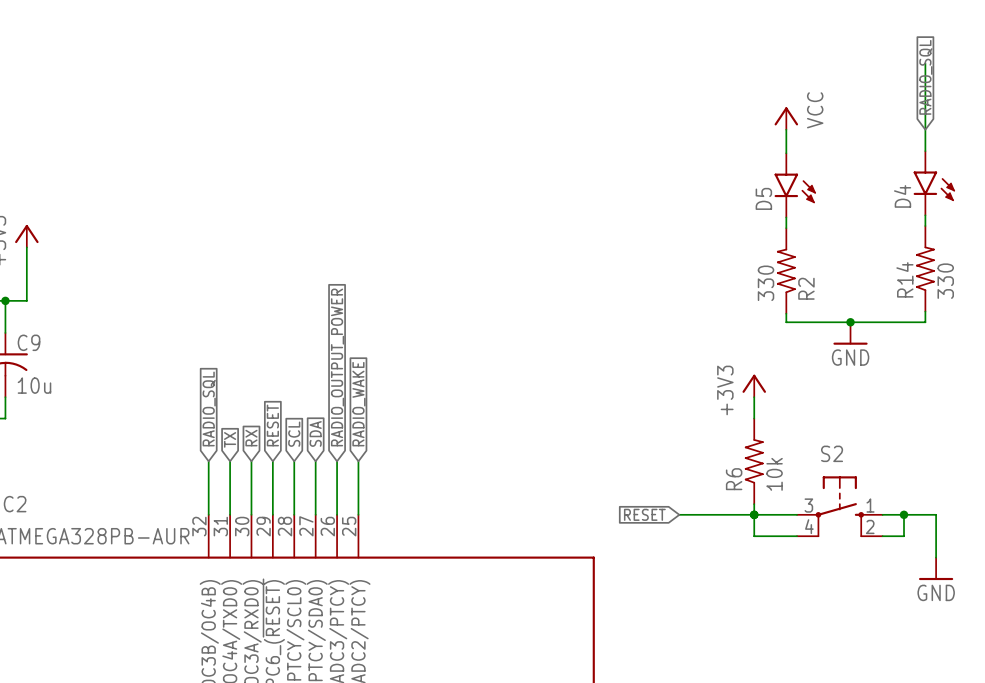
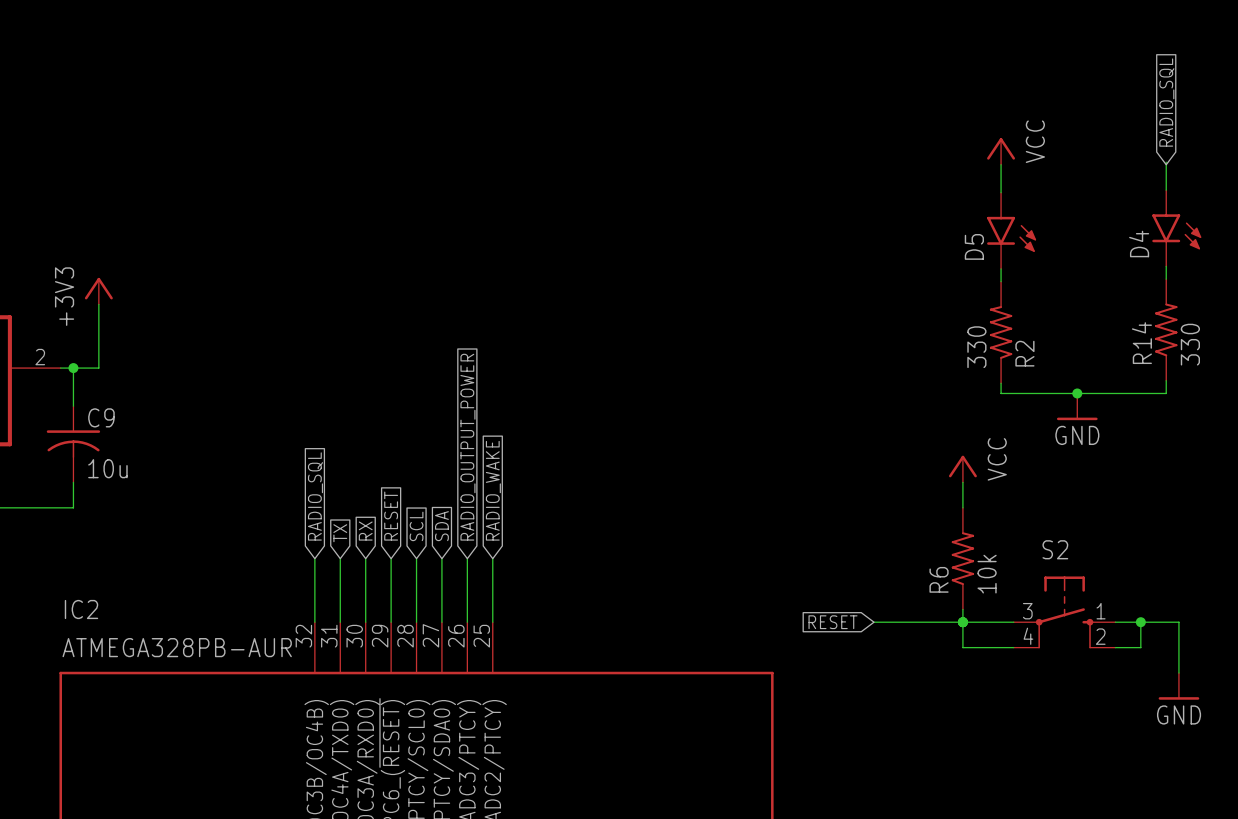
wire: (925, 63) (925, 127) -> none
power symbol: +3V3 (754, 385) -> VCC (962, 469)

